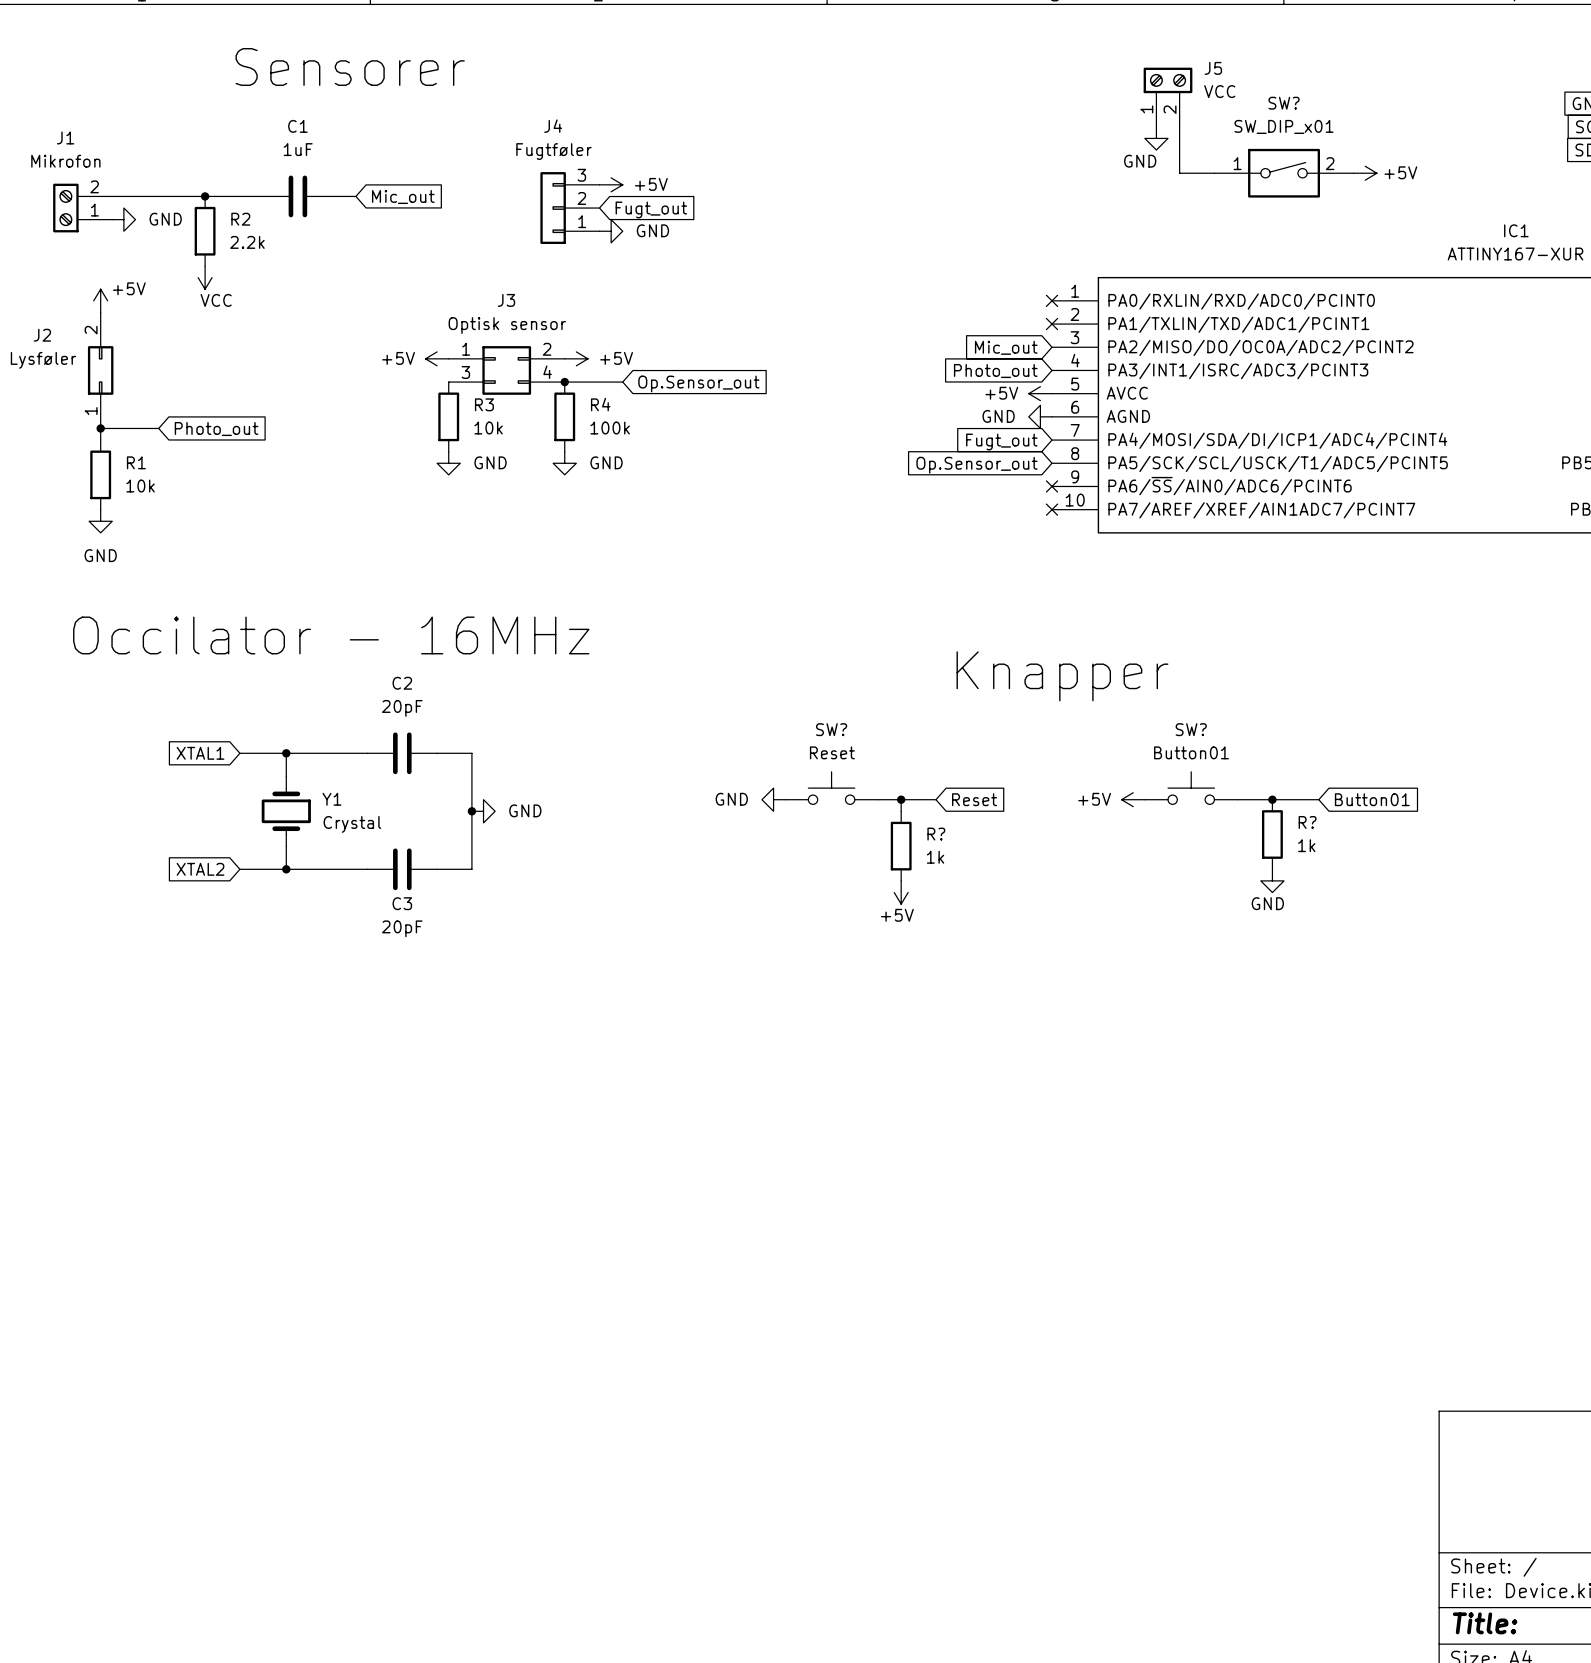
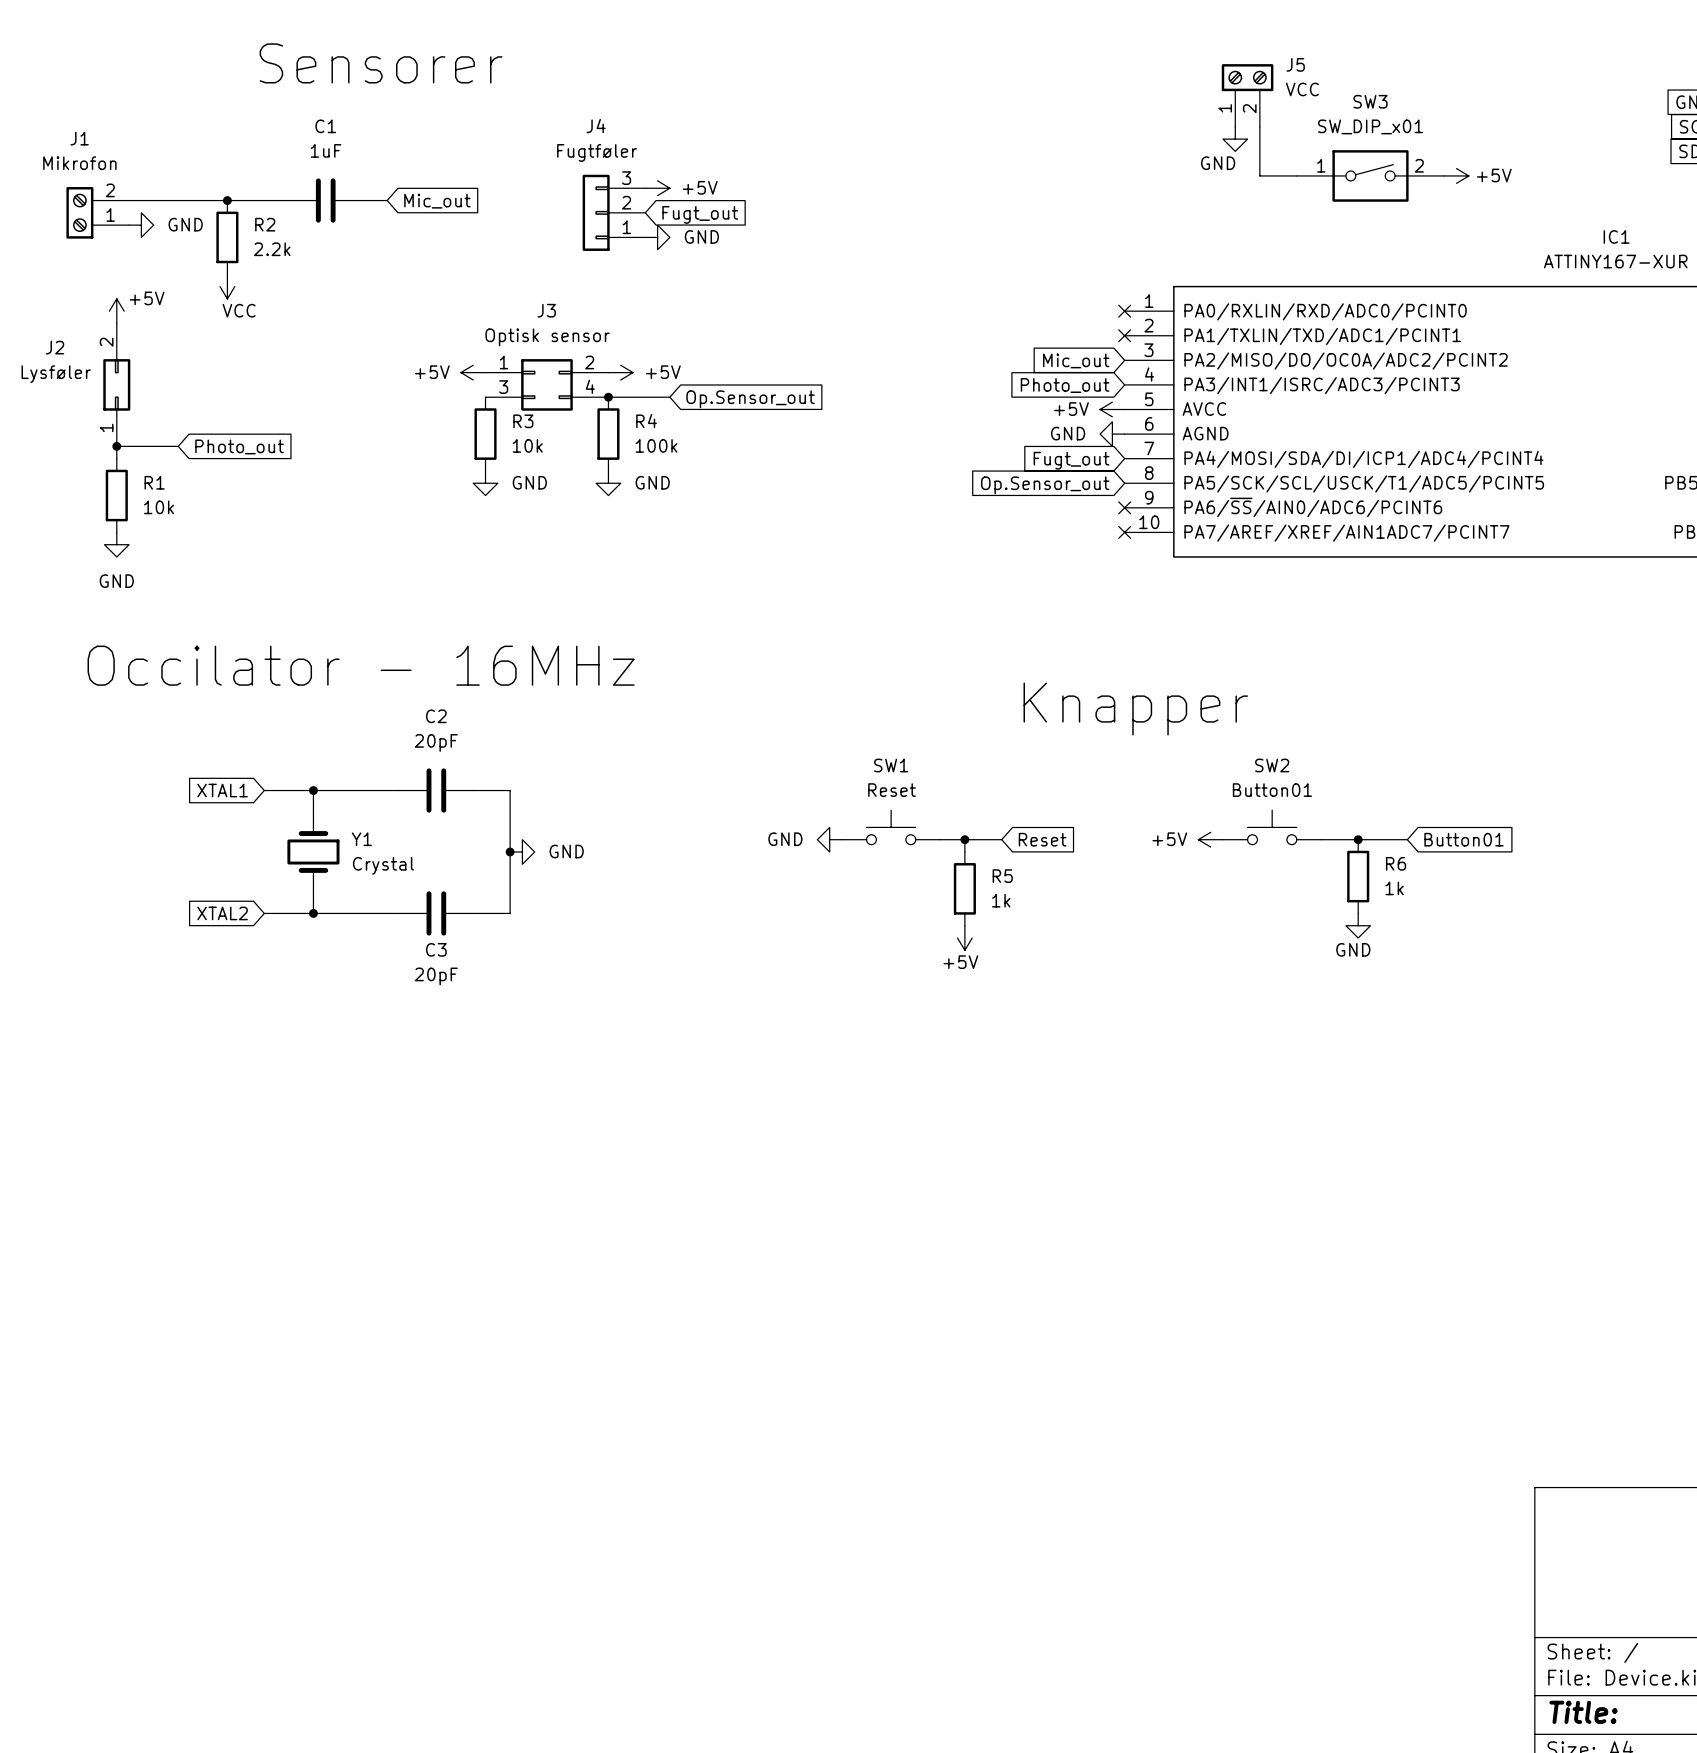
SW? name: SW? (1284, 103) -> SW3 (1370, 101)
SW? name: SW? (831, 729) -> SW1 (891, 765)
SW? name: SW? (1191, 729) -> SW2 (1272, 765)
R? name: R? (1307, 822) -> R6 (1396, 863)
R? name: R? (936, 834) -> R5 (1002, 876)

